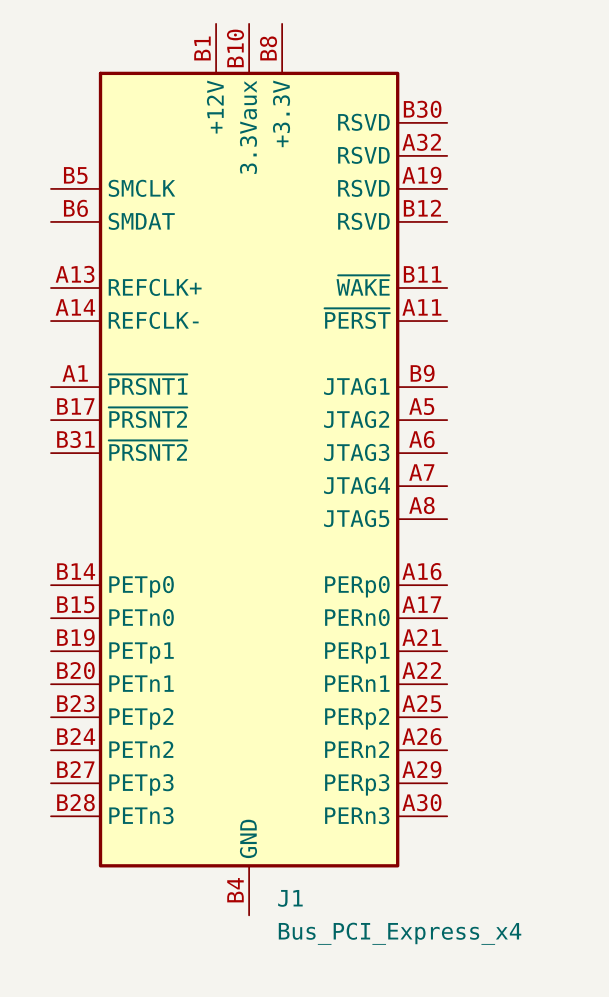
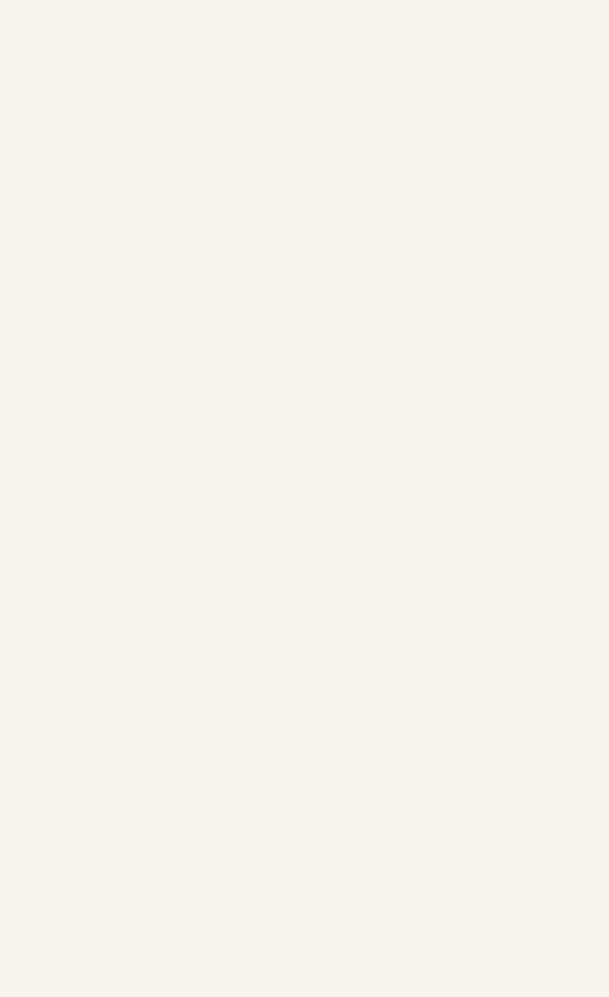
J1: Bus_PCI_Express_x4 (249, 469) -> none

